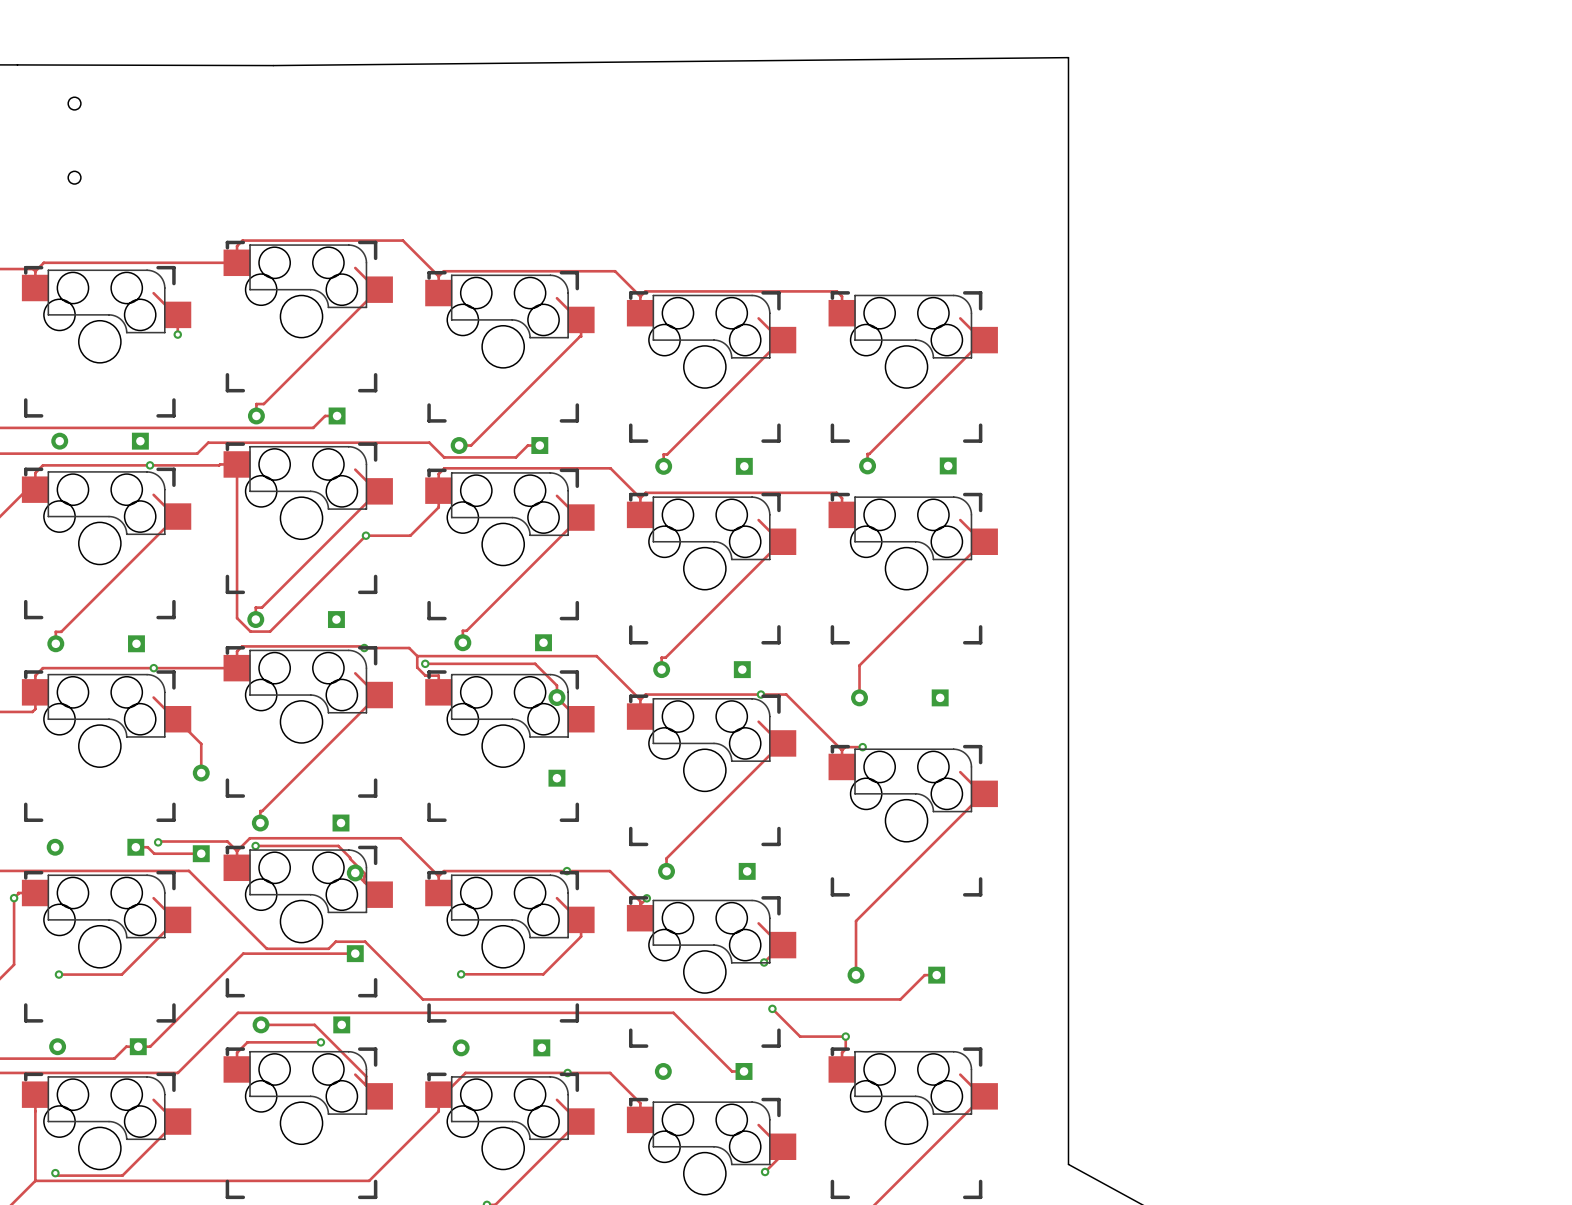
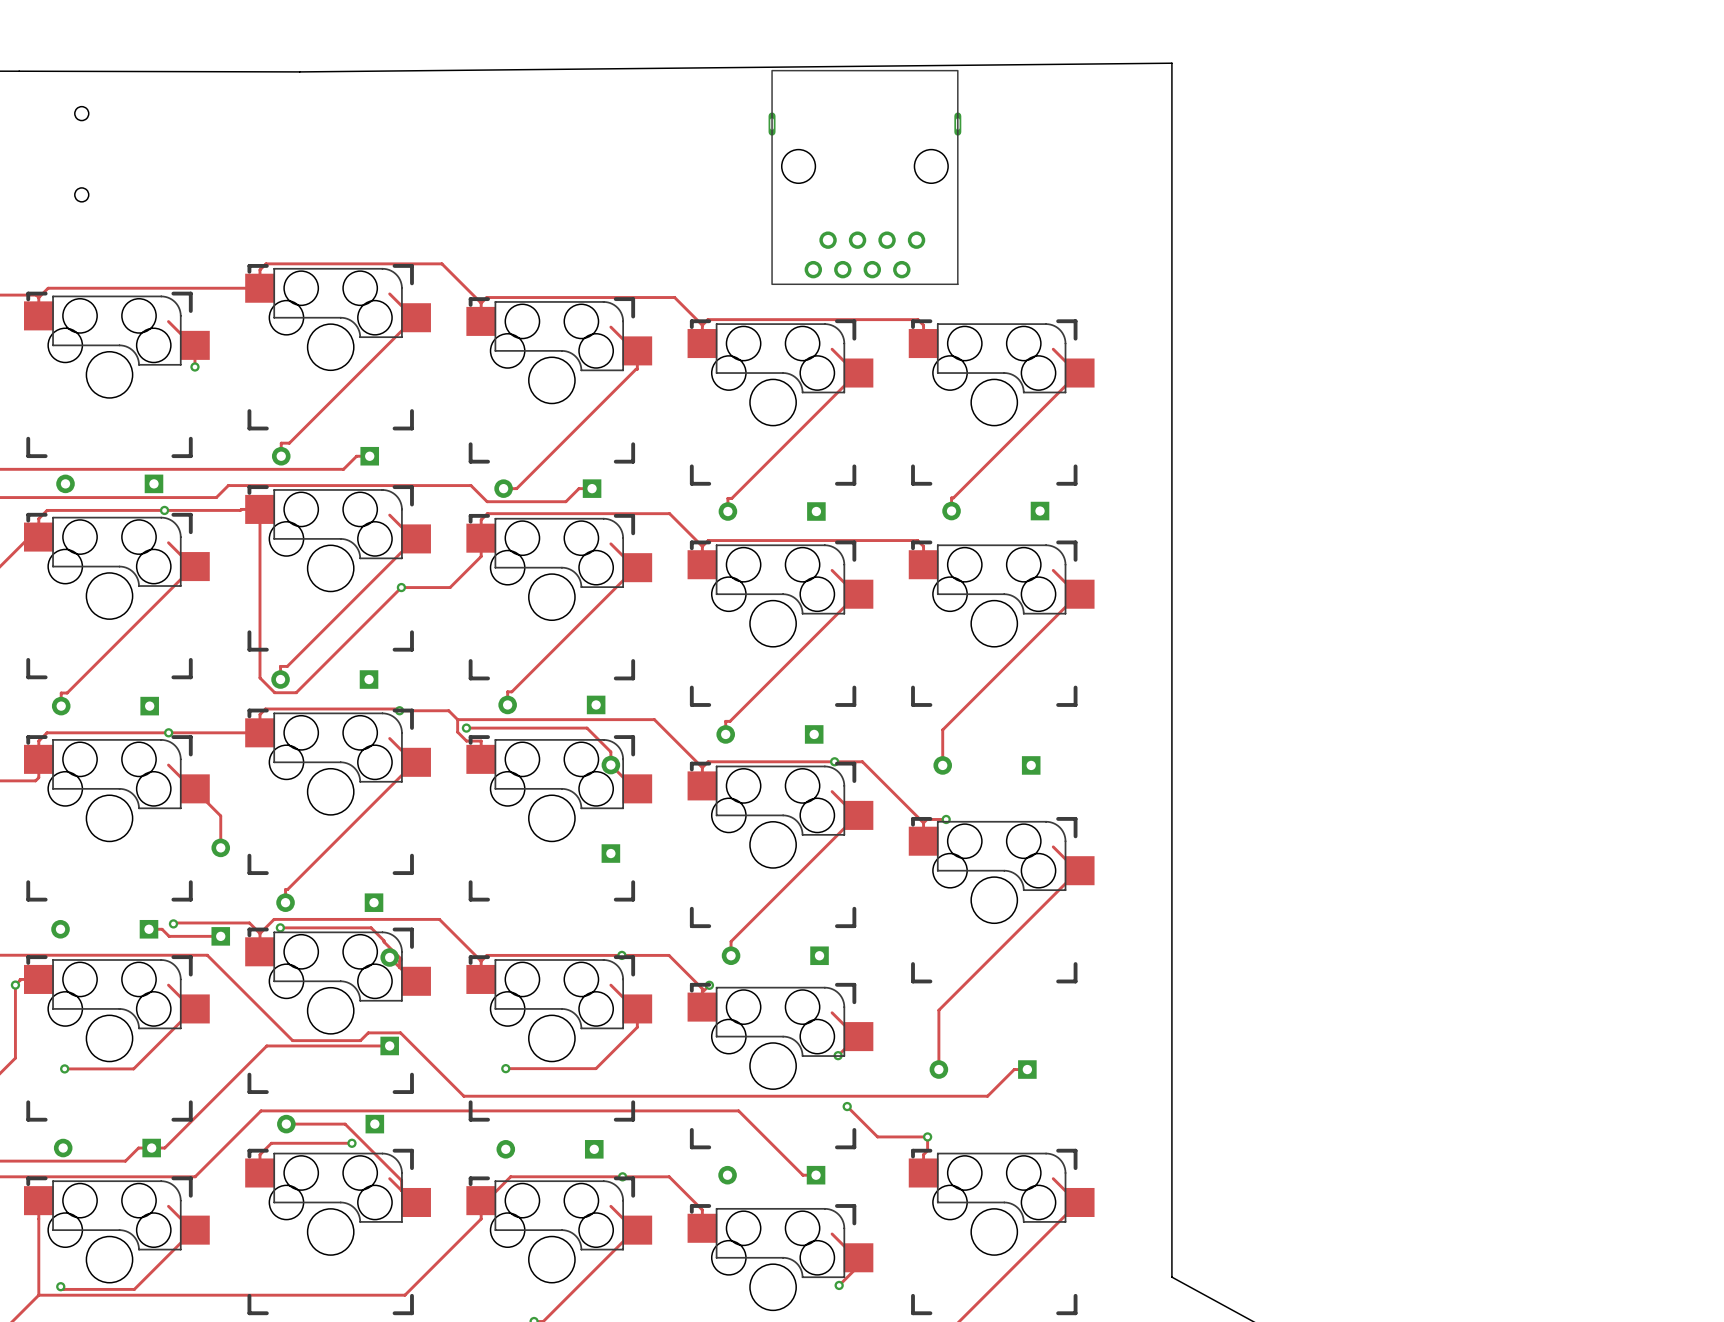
part: none -> (864, 177)

